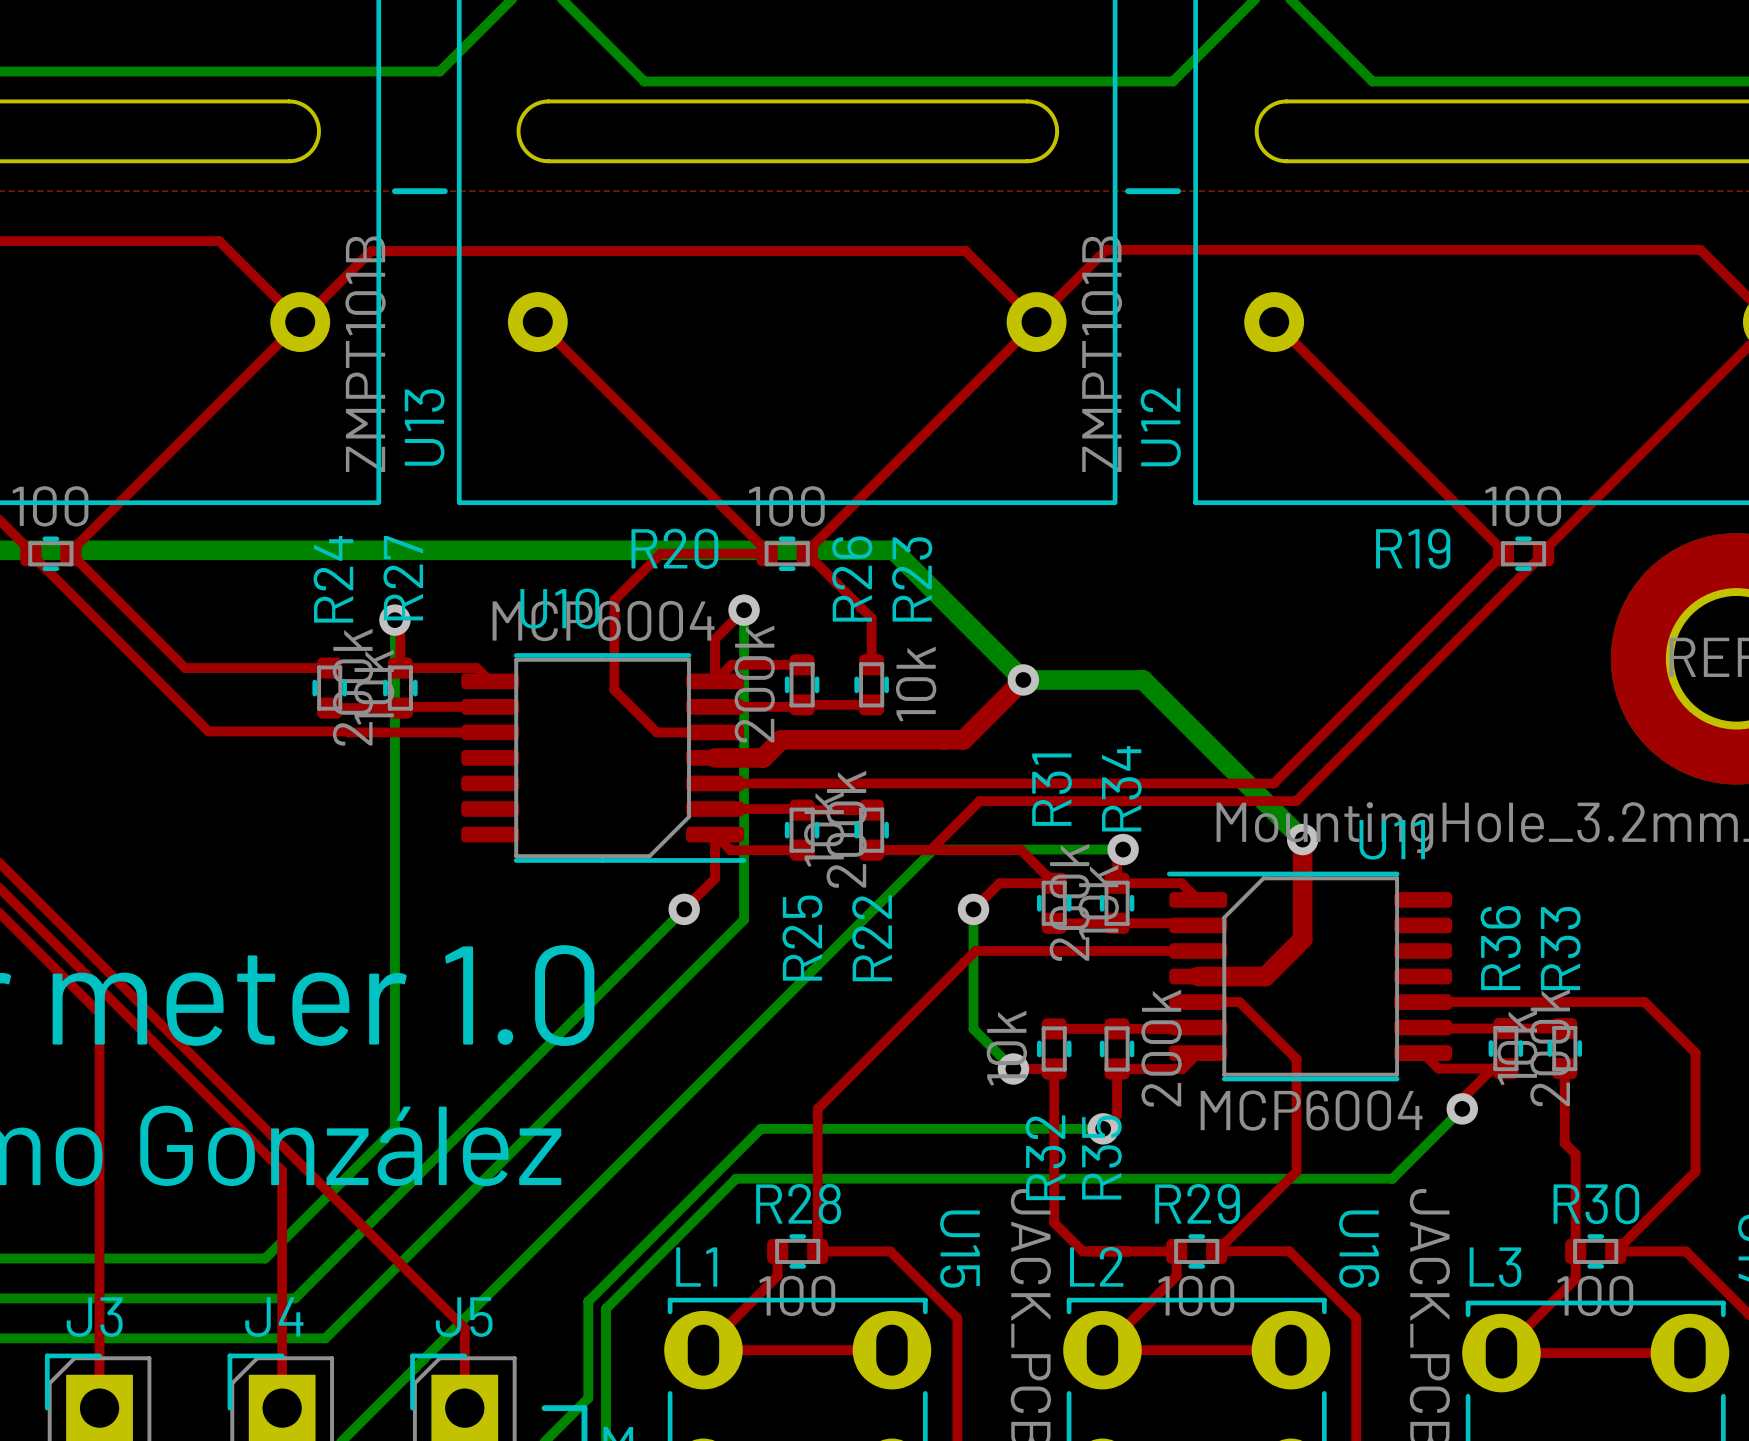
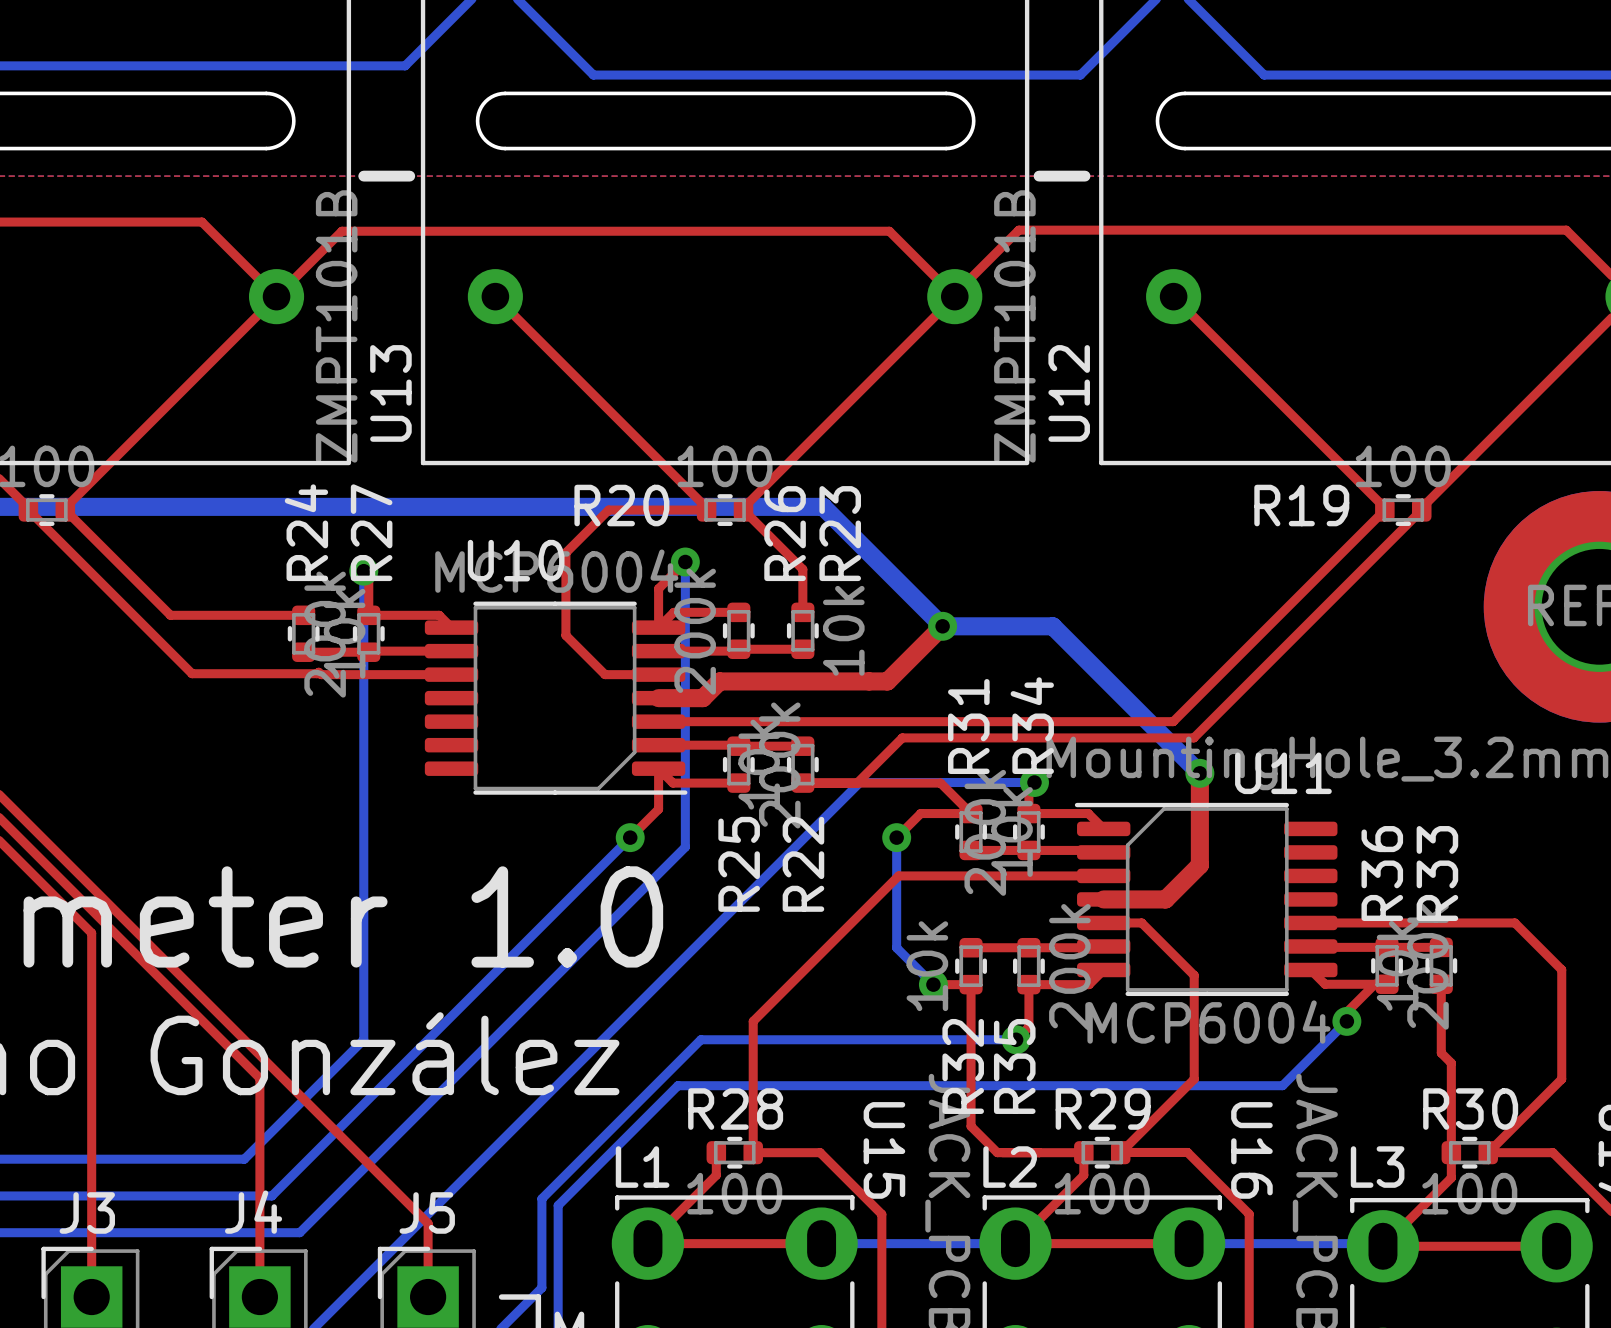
line width: thin (394, 191) (444, 191) -> thick (363, 176) (409, 176)
line width: thin (1128, 191) (1177, 191) -> thick (1039, 176) (1085, 176)
bottom track: none -> (821, 1243) (1015, 1243)
bottom track: none -> (1189, 1243) (1380, 1243) (1382, 1246)

